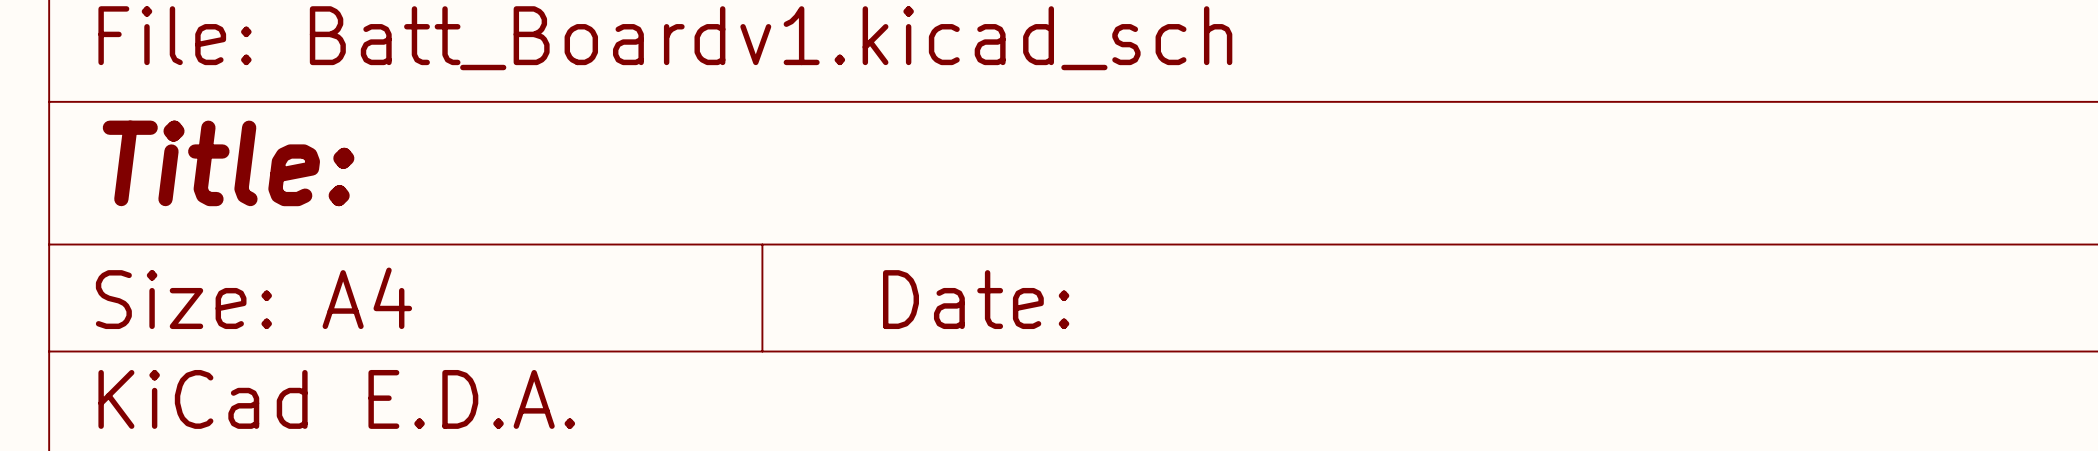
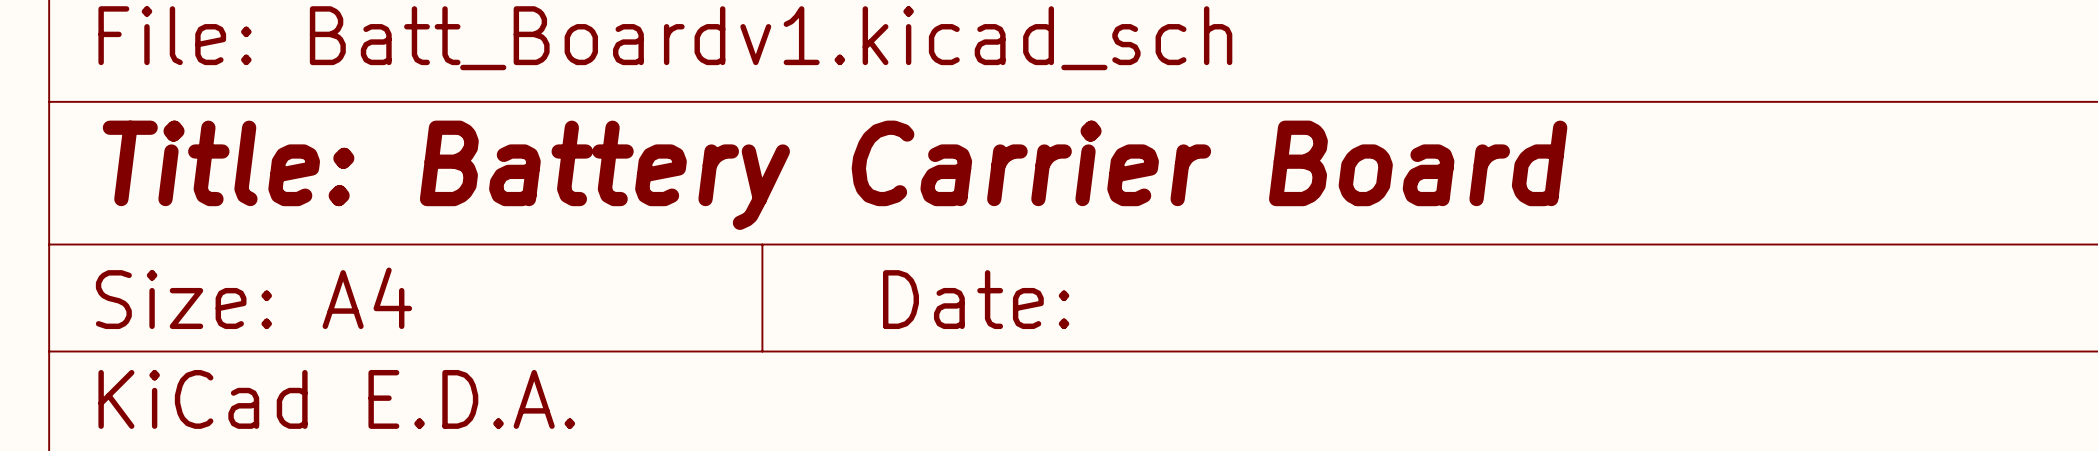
title block: Title: (228, 163) -> Title: Battery Carrier Board (835, 175)

